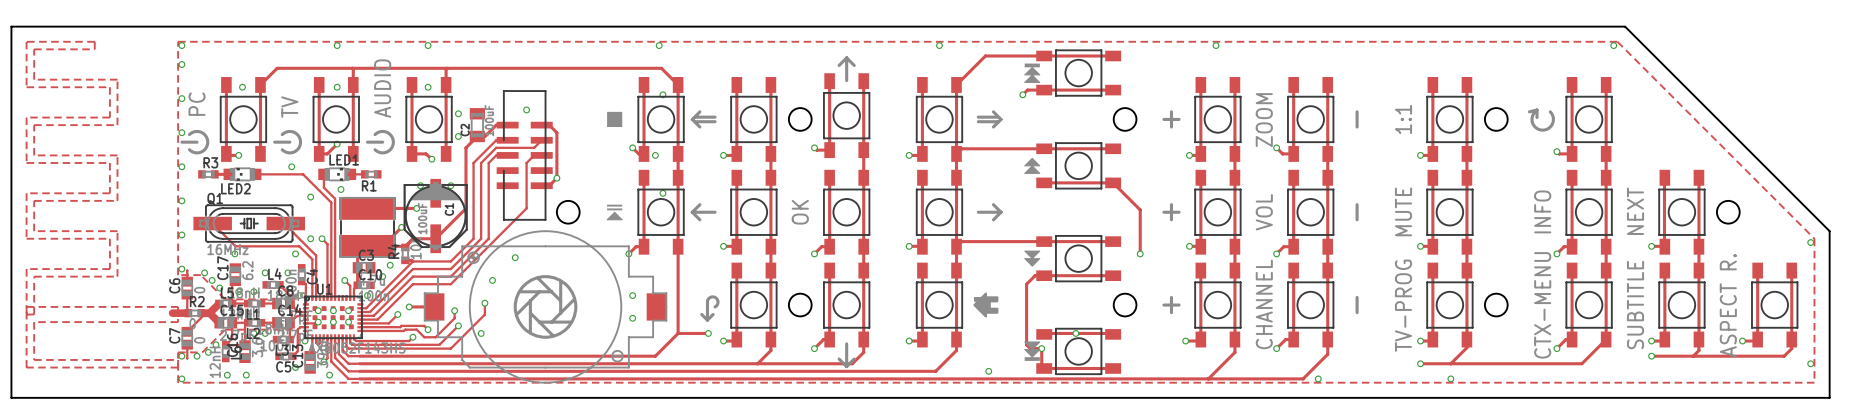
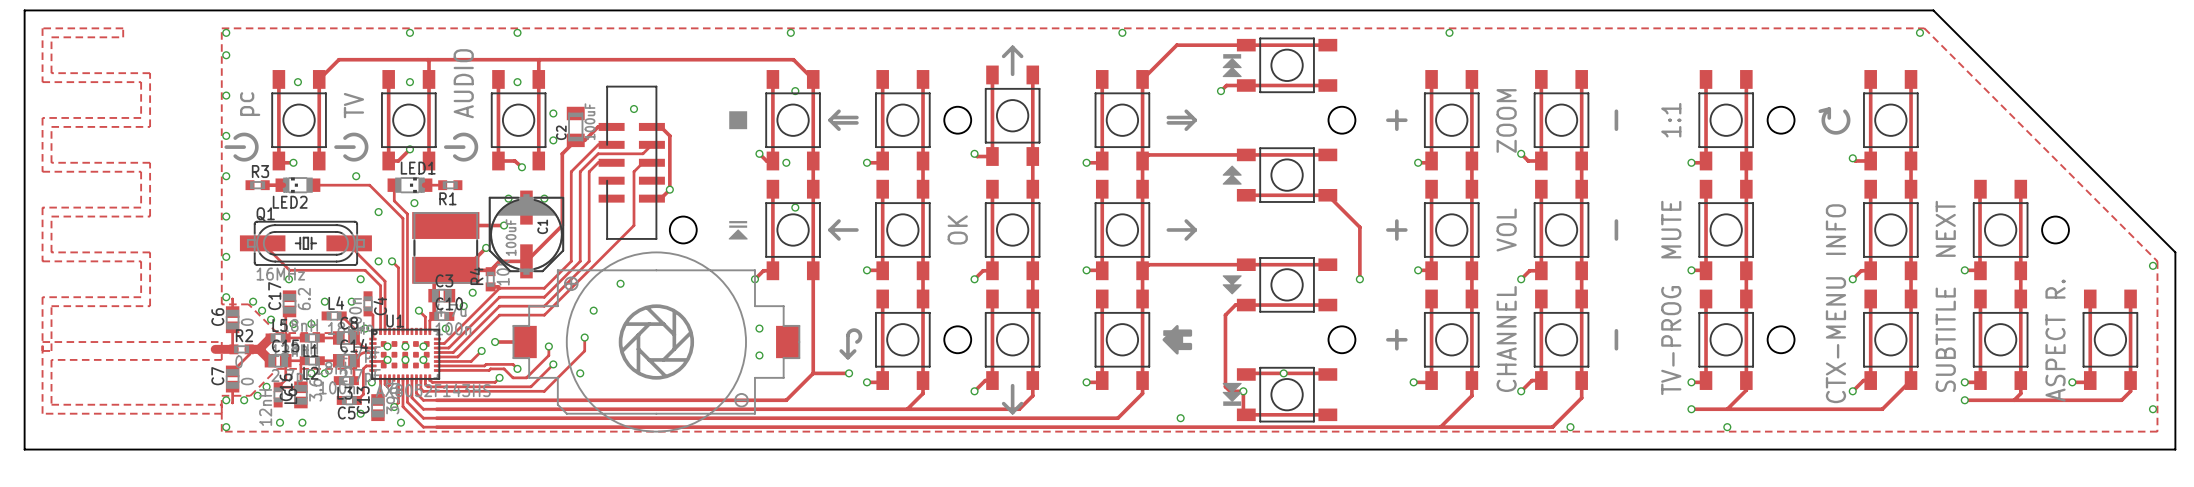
drawing shape: [180, 92, 210, 155] -> [224, 92, 261, 162]

